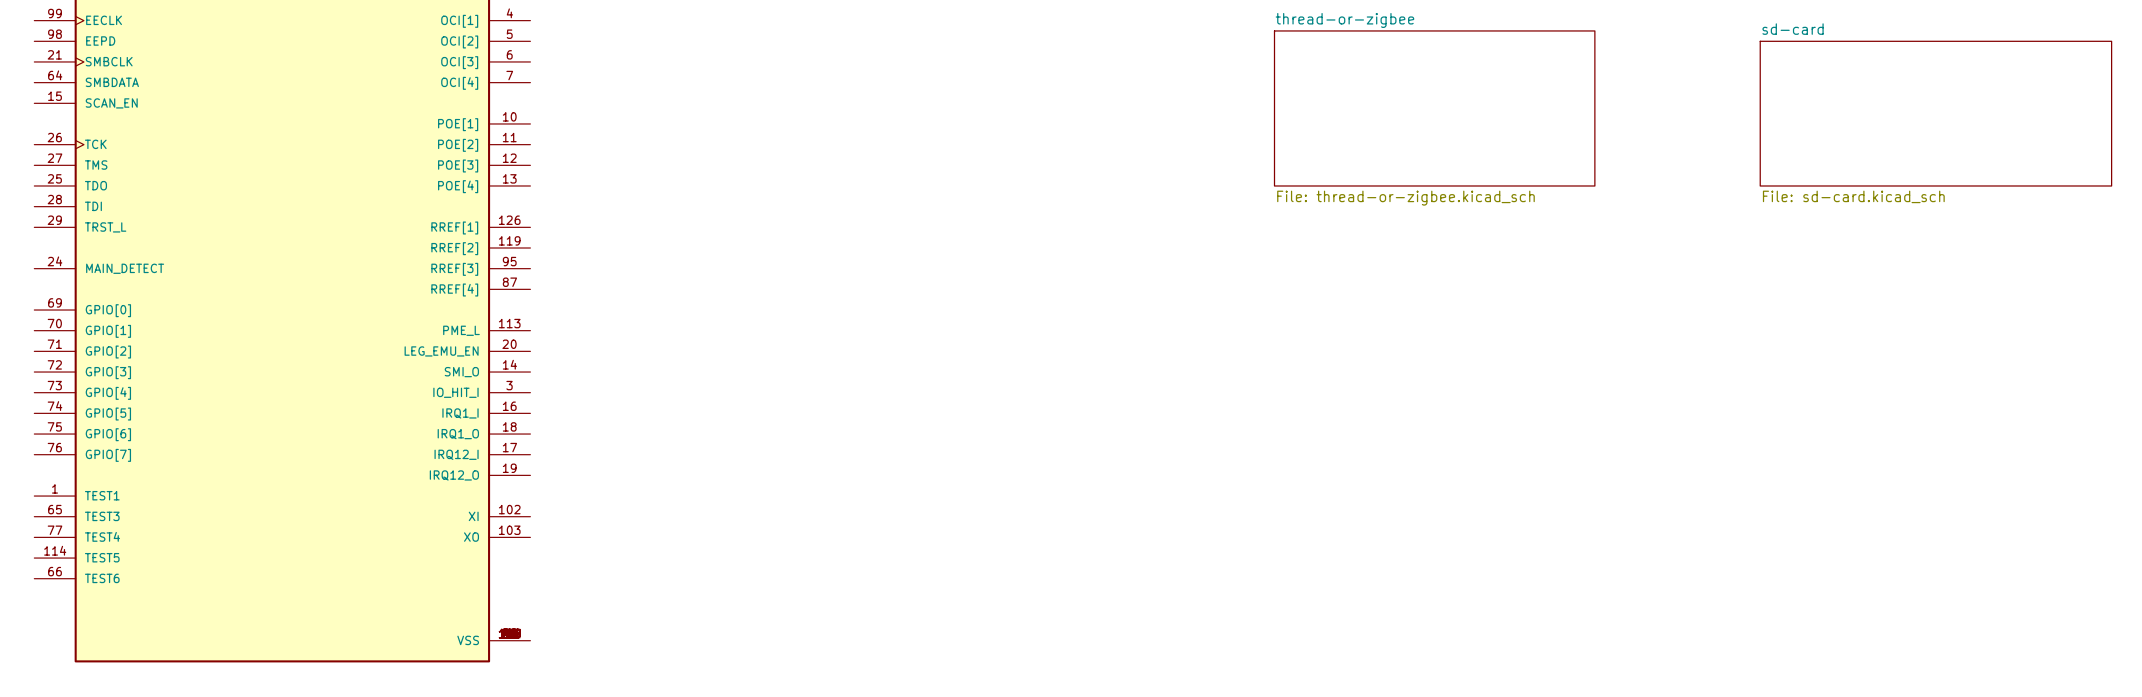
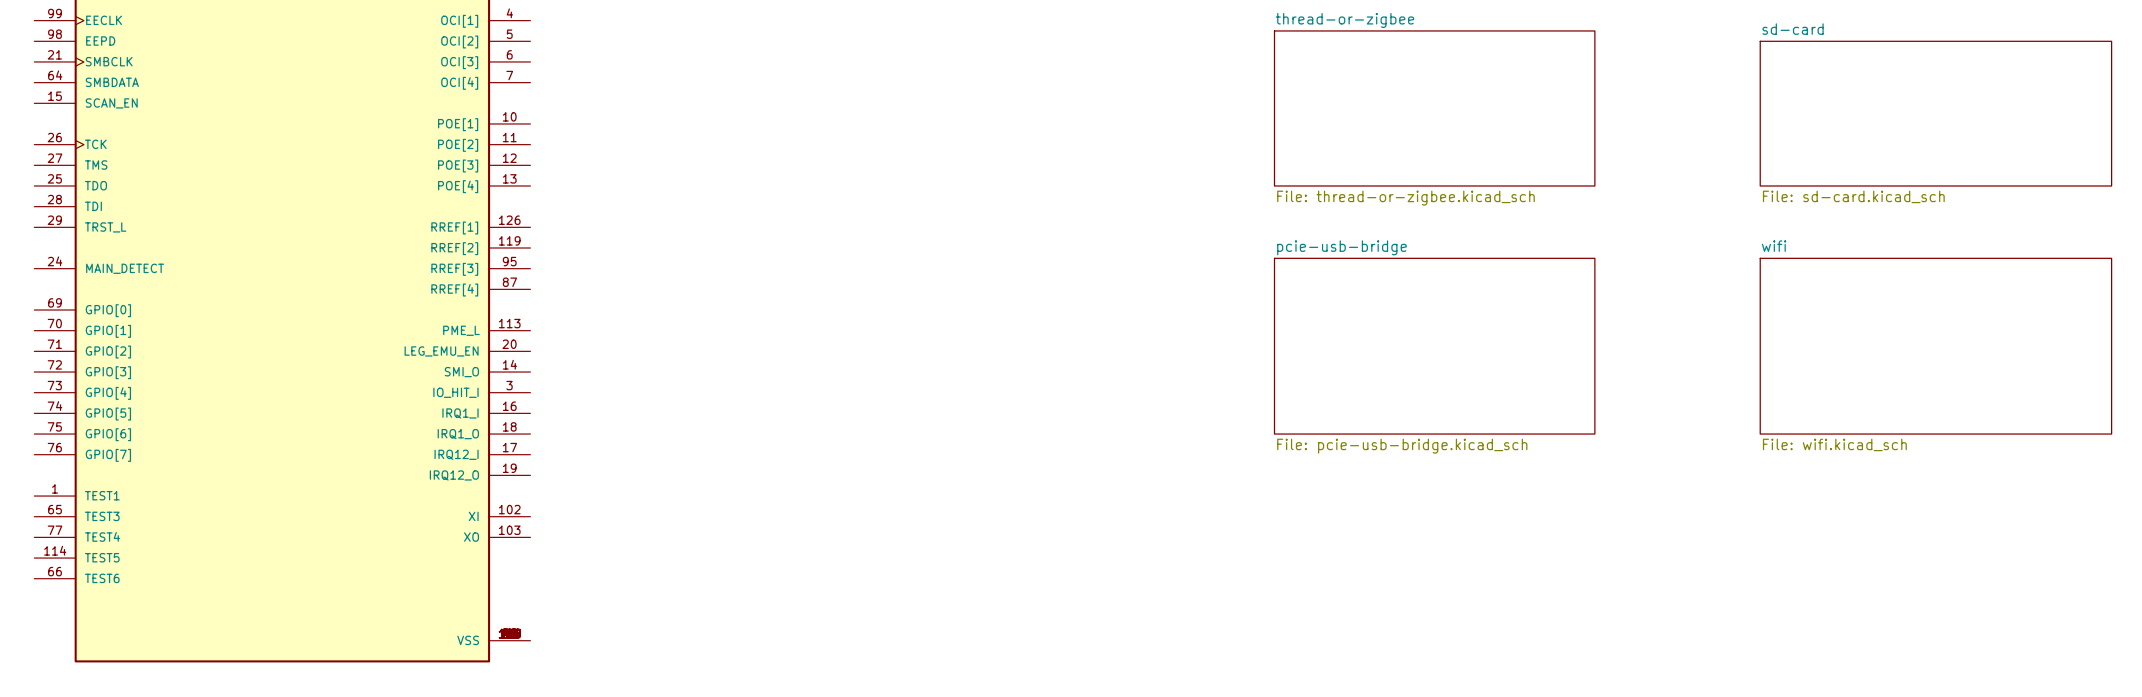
sheet pcie-usb-bridge: none -> File: pcie-usb-bridge.kicad_sch (1434, 346)
sheet wifi: none -> File: wifi.kicad_sch (1935, 346)

